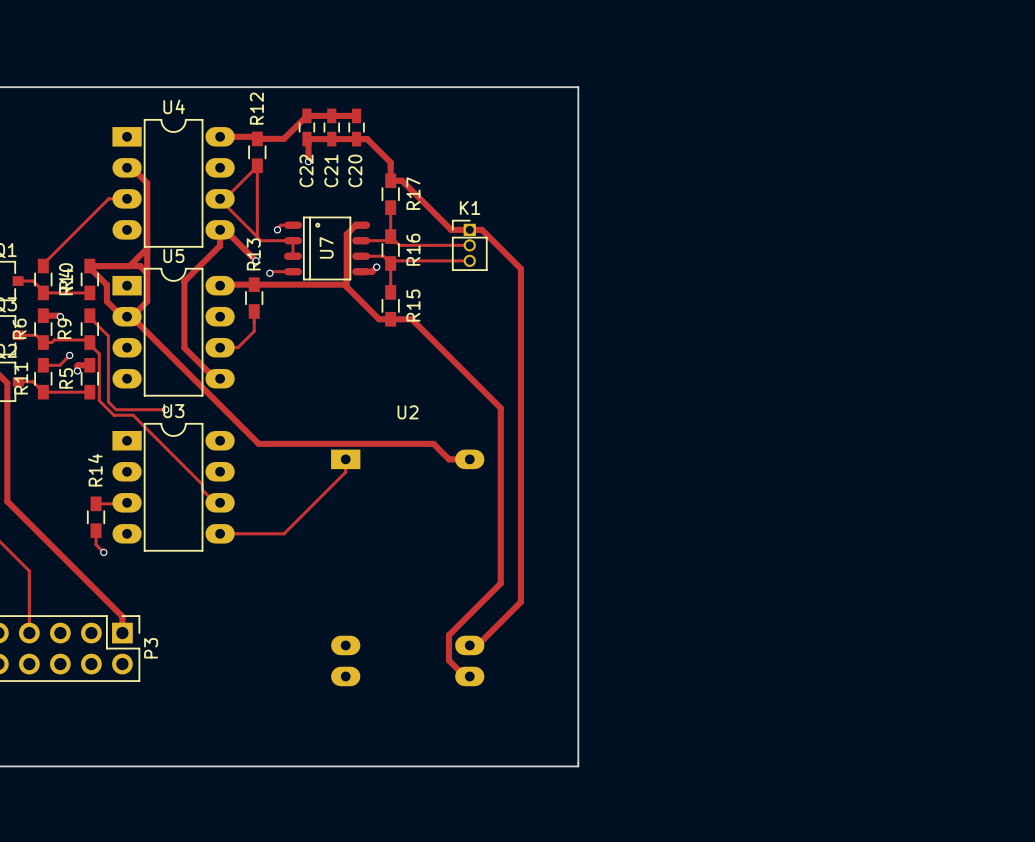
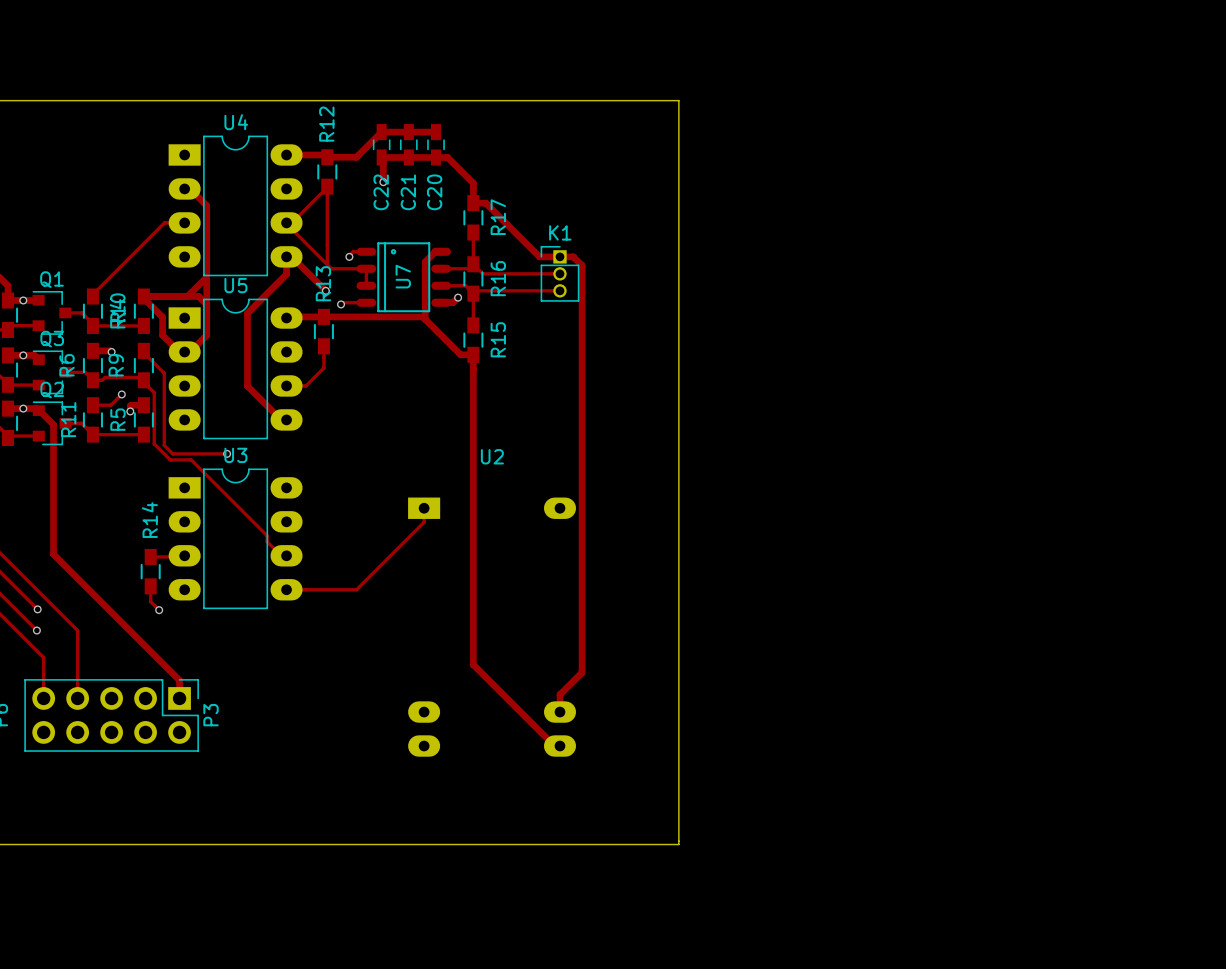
track: (489, 237) (520, 268) (520, 602) (477, 645) (469, 645) -> (582, 265) (582, 672) (559, 694) (559, 712)
track: (131, 316) (258, 443) (433, 443) (449, 459) (464, 459) -> none
track: (390, 319) (411, 319) (500, 408) (500, 583) (449, 635) (449, 660) -> (473, 354) (473, 664) (537, 728)

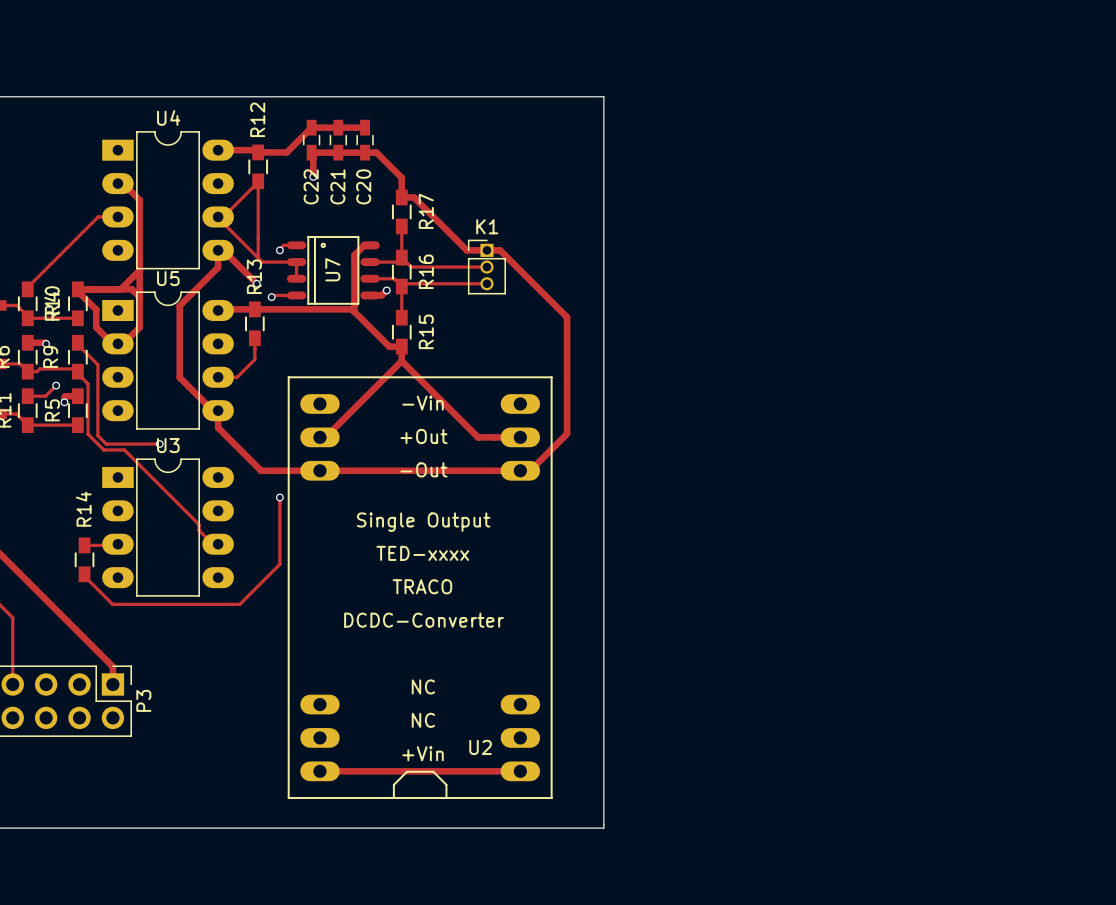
track: (582, 265) (582, 672) (559, 694) (559, 712) -> (508, 258) (567, 317) (567, 433) (530, 470) (261, 470) (218, 427) (218, 410)
track: (473, 369) (473, 664) (554, 746) (559, 746) -> none
track: none -> (310, 437) (325, 437) (401, 361) (478, 437) (520, 437)
U2 name position: U2 (492, 456) -> U2 (480, 747)
U2 footprint: [408, 497, 577, 757] -> [287, 376, 553, 800]
via: none -> (279, 497)
track: (424, 508) (424, 522) (356, 589) (286, 589) -> none
track: (150, 588) (150, 601) (159, 610) -> (84, 576) (112, 604) (239, 604) (279, 564) (279, 497)
via: (159, 610) -> none
track: none -> (319, 771) (520, 771)

